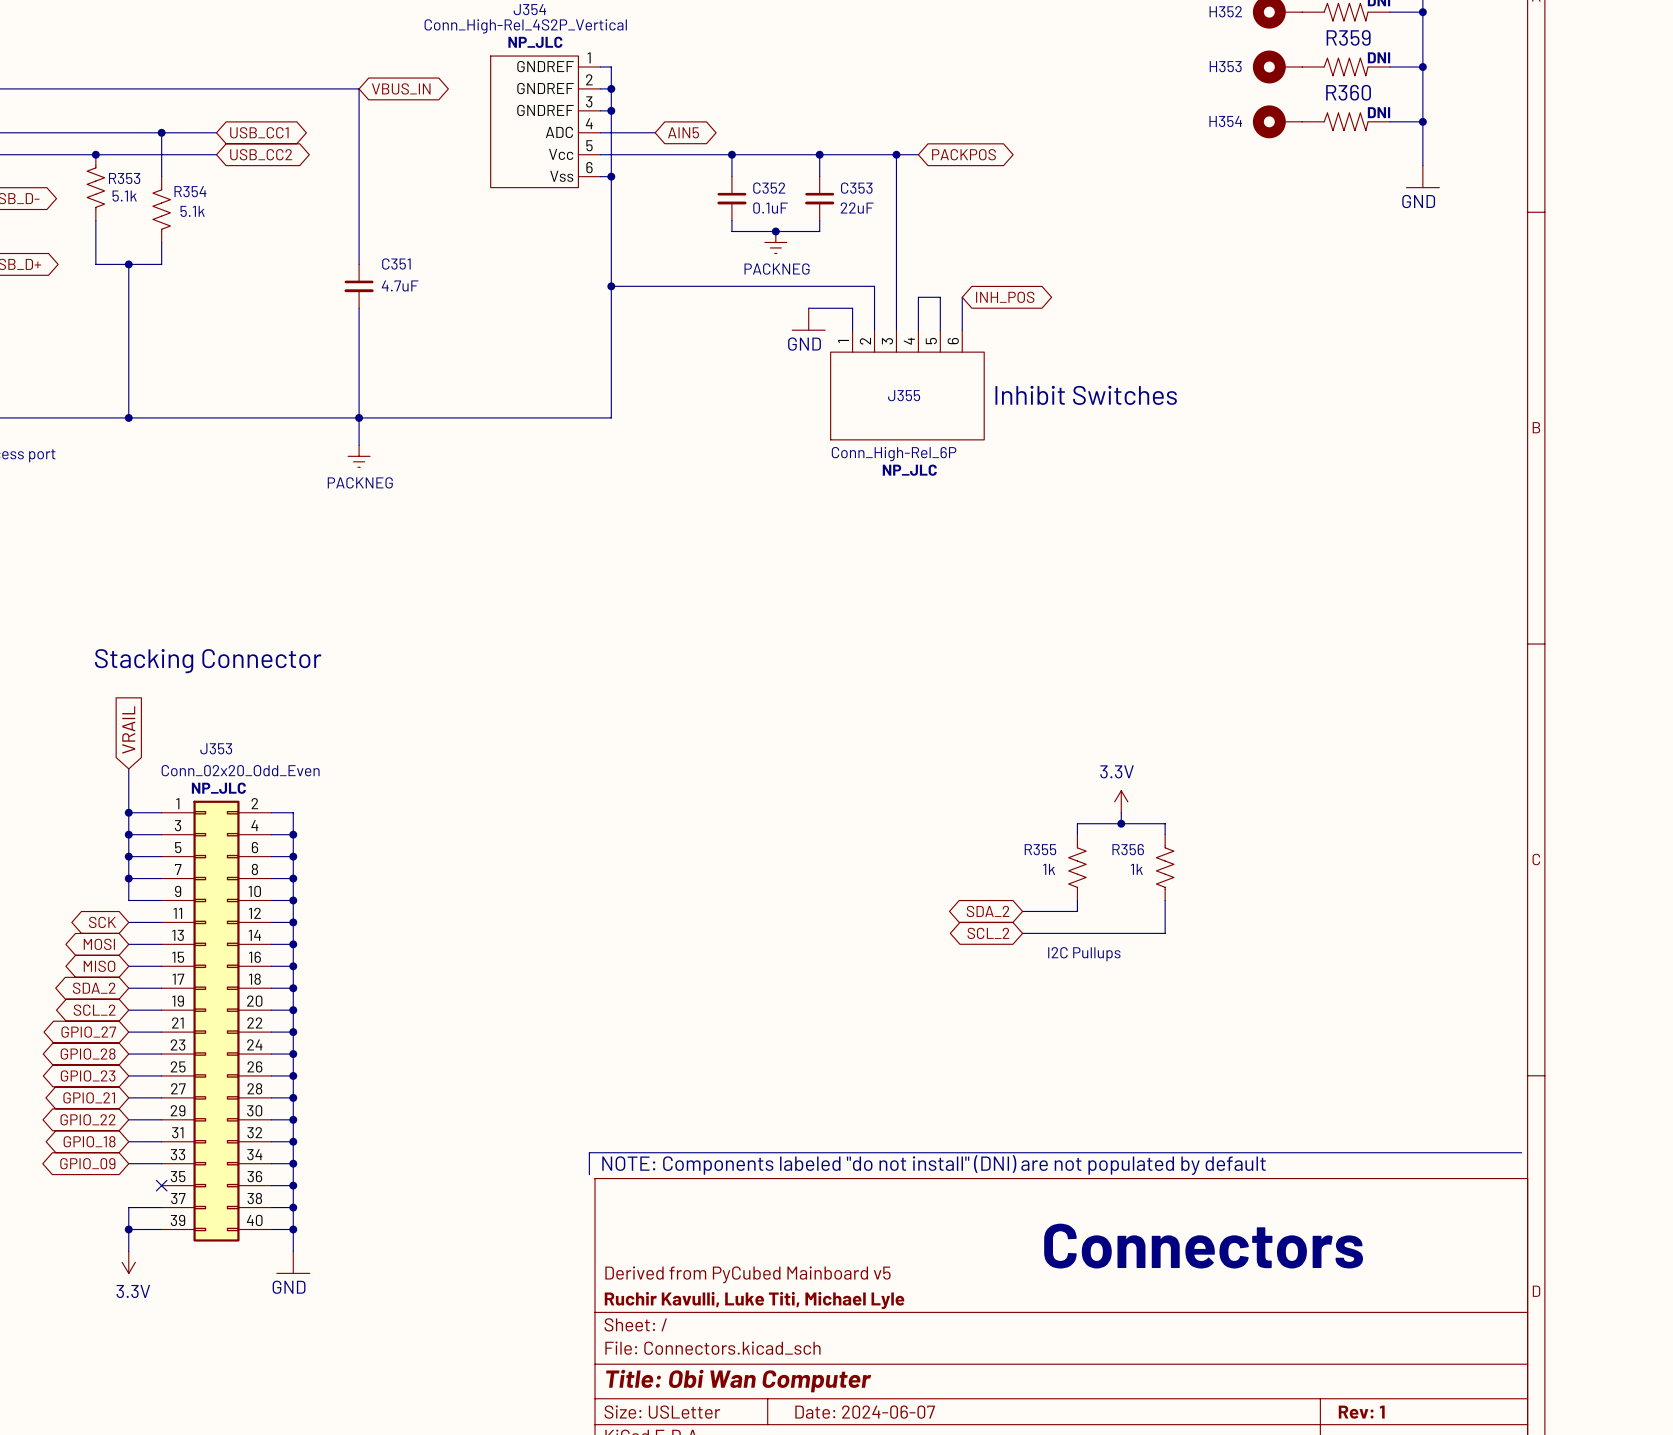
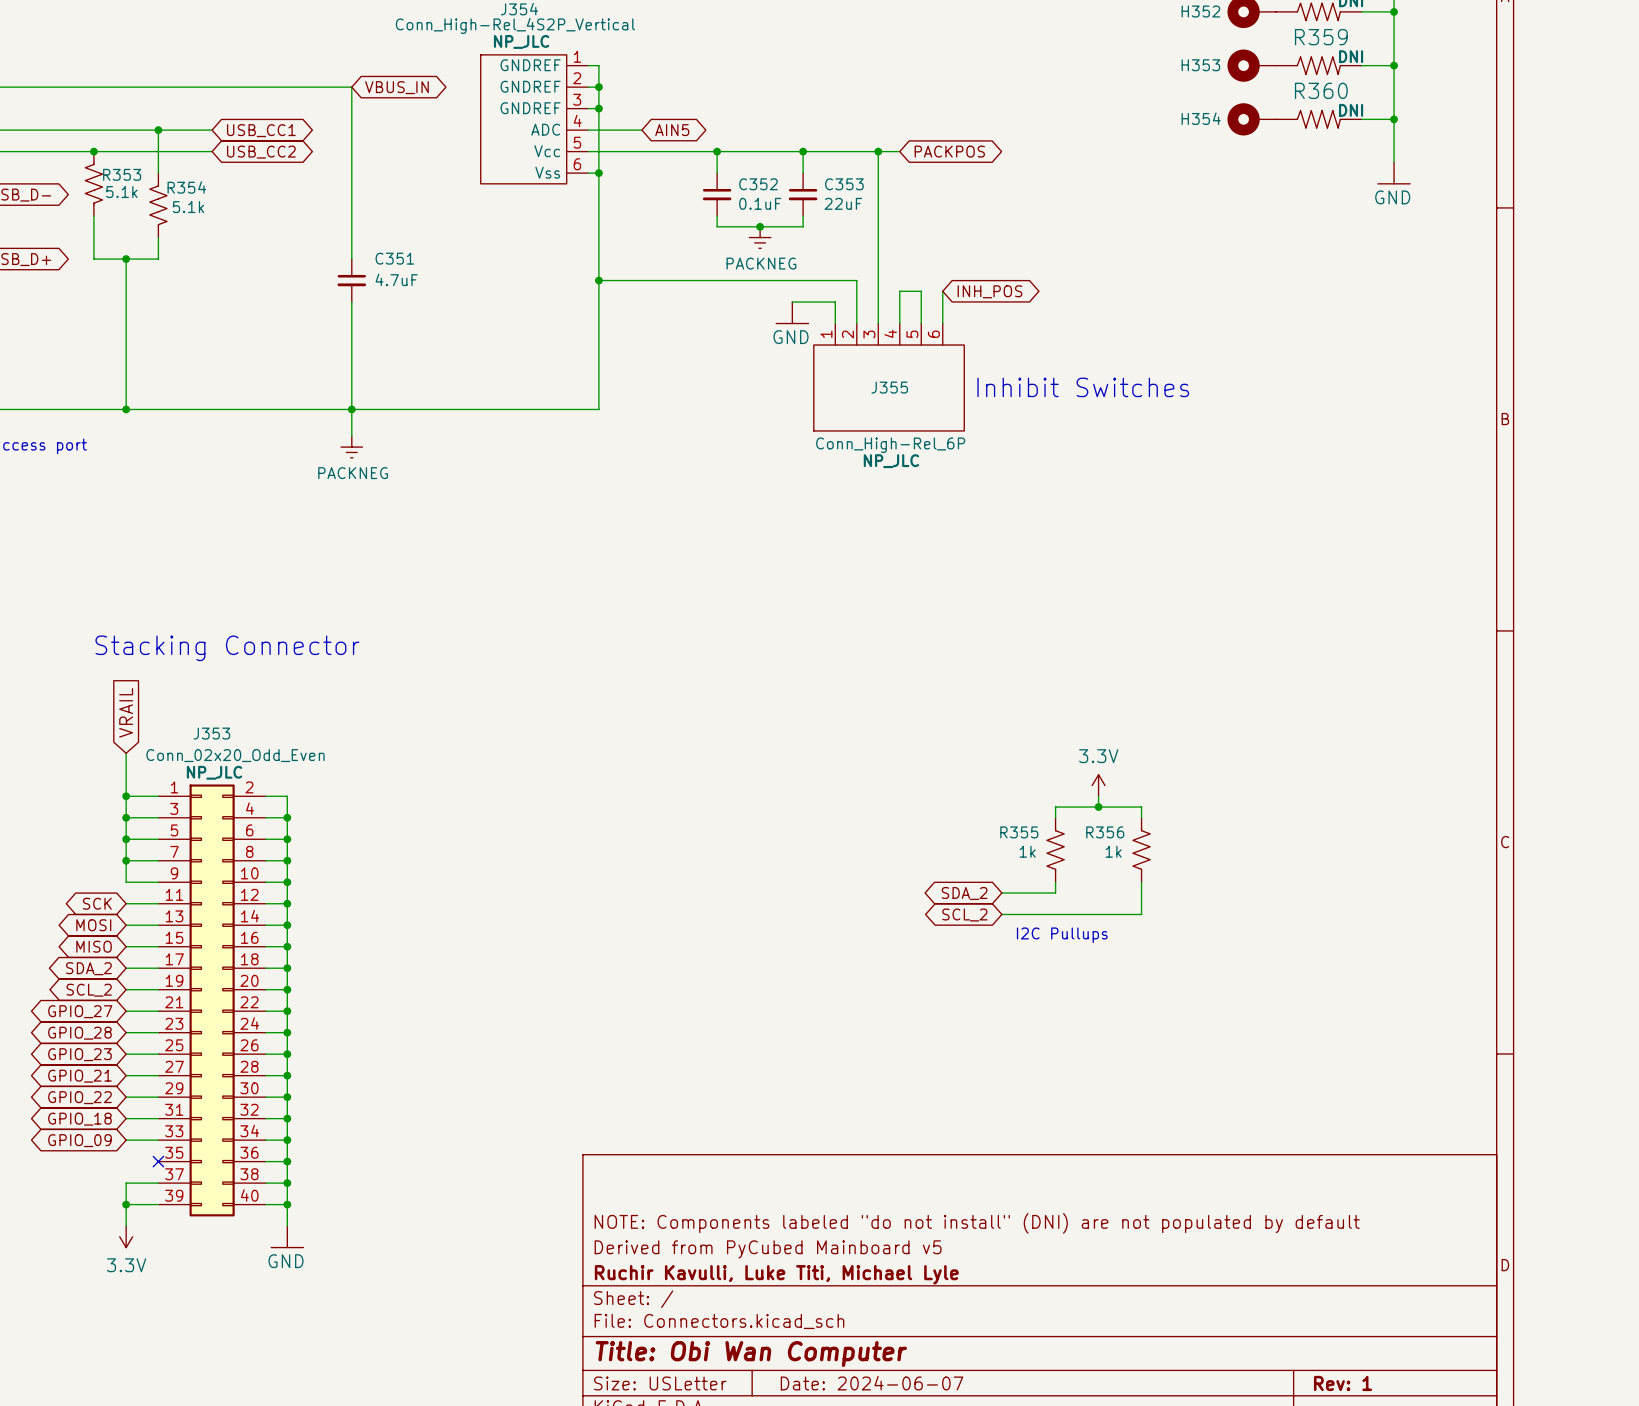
line: (1521, 1152) (589, 1152) (589, 1174) -> none
text: NOTE: Components labeled "do not install" (DNI) are not populated by default (934, 1165) -> none
text: Connectors (1203, 1246) -> none
title block: none -> NOTE: Components labeled "do not install" (DNI) are not populated by default (977, 1223)

